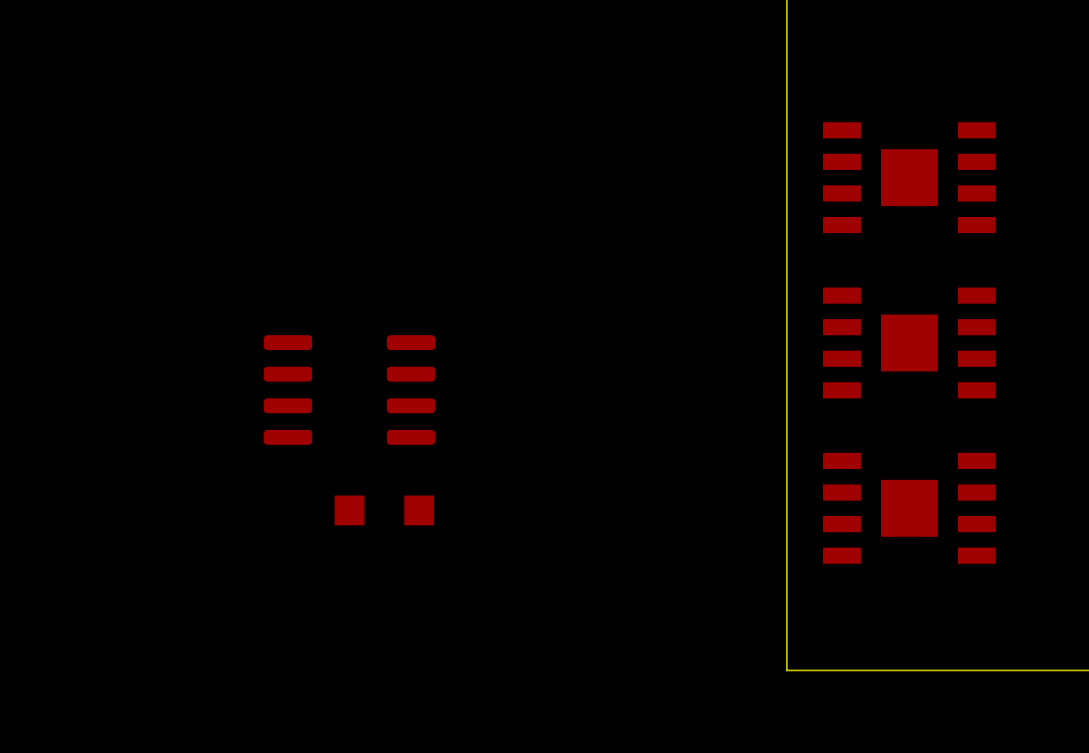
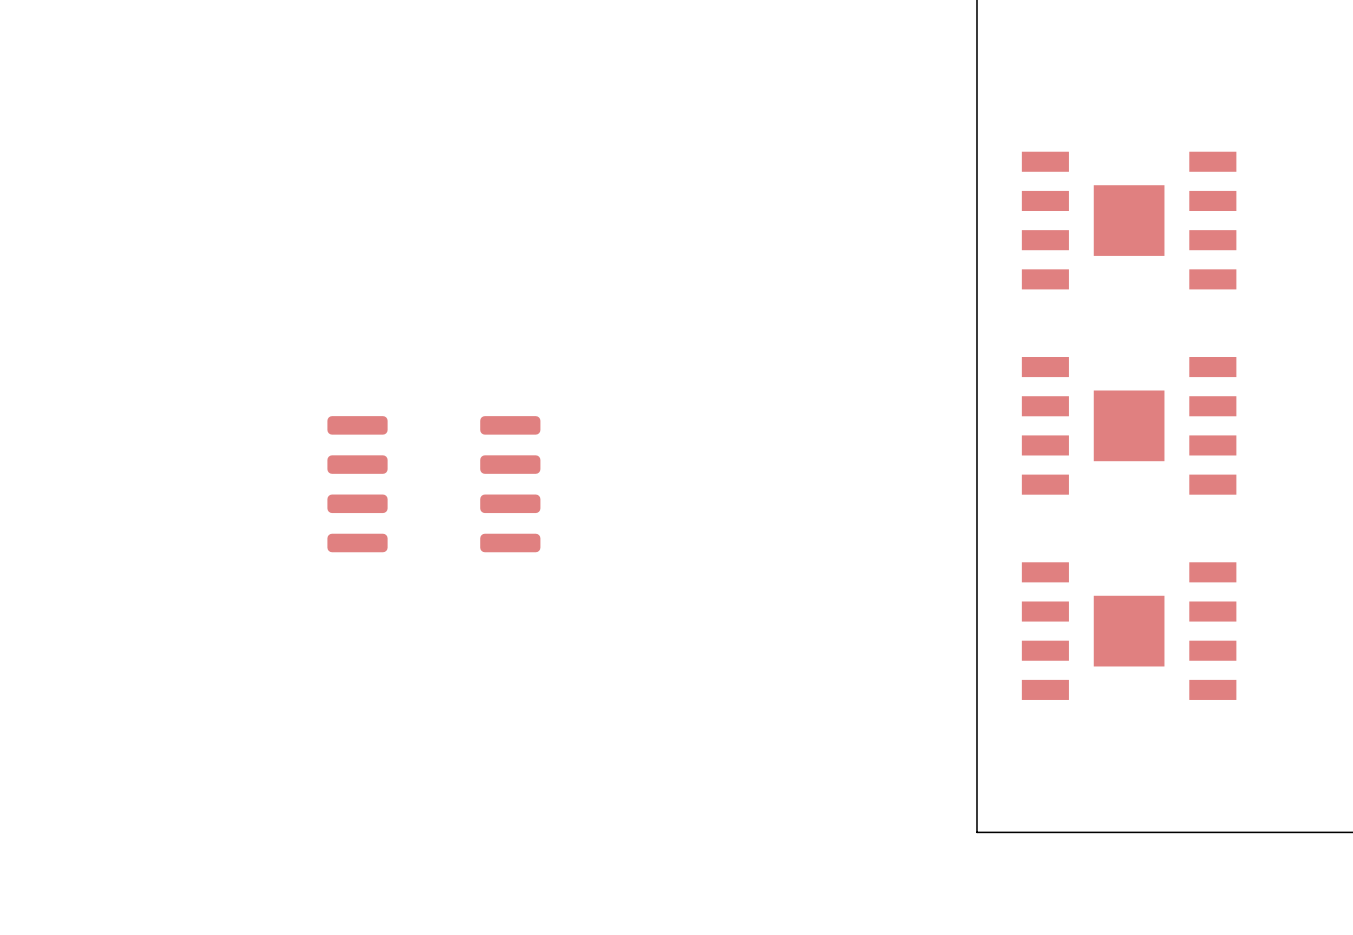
part: (384, 510) -> none

